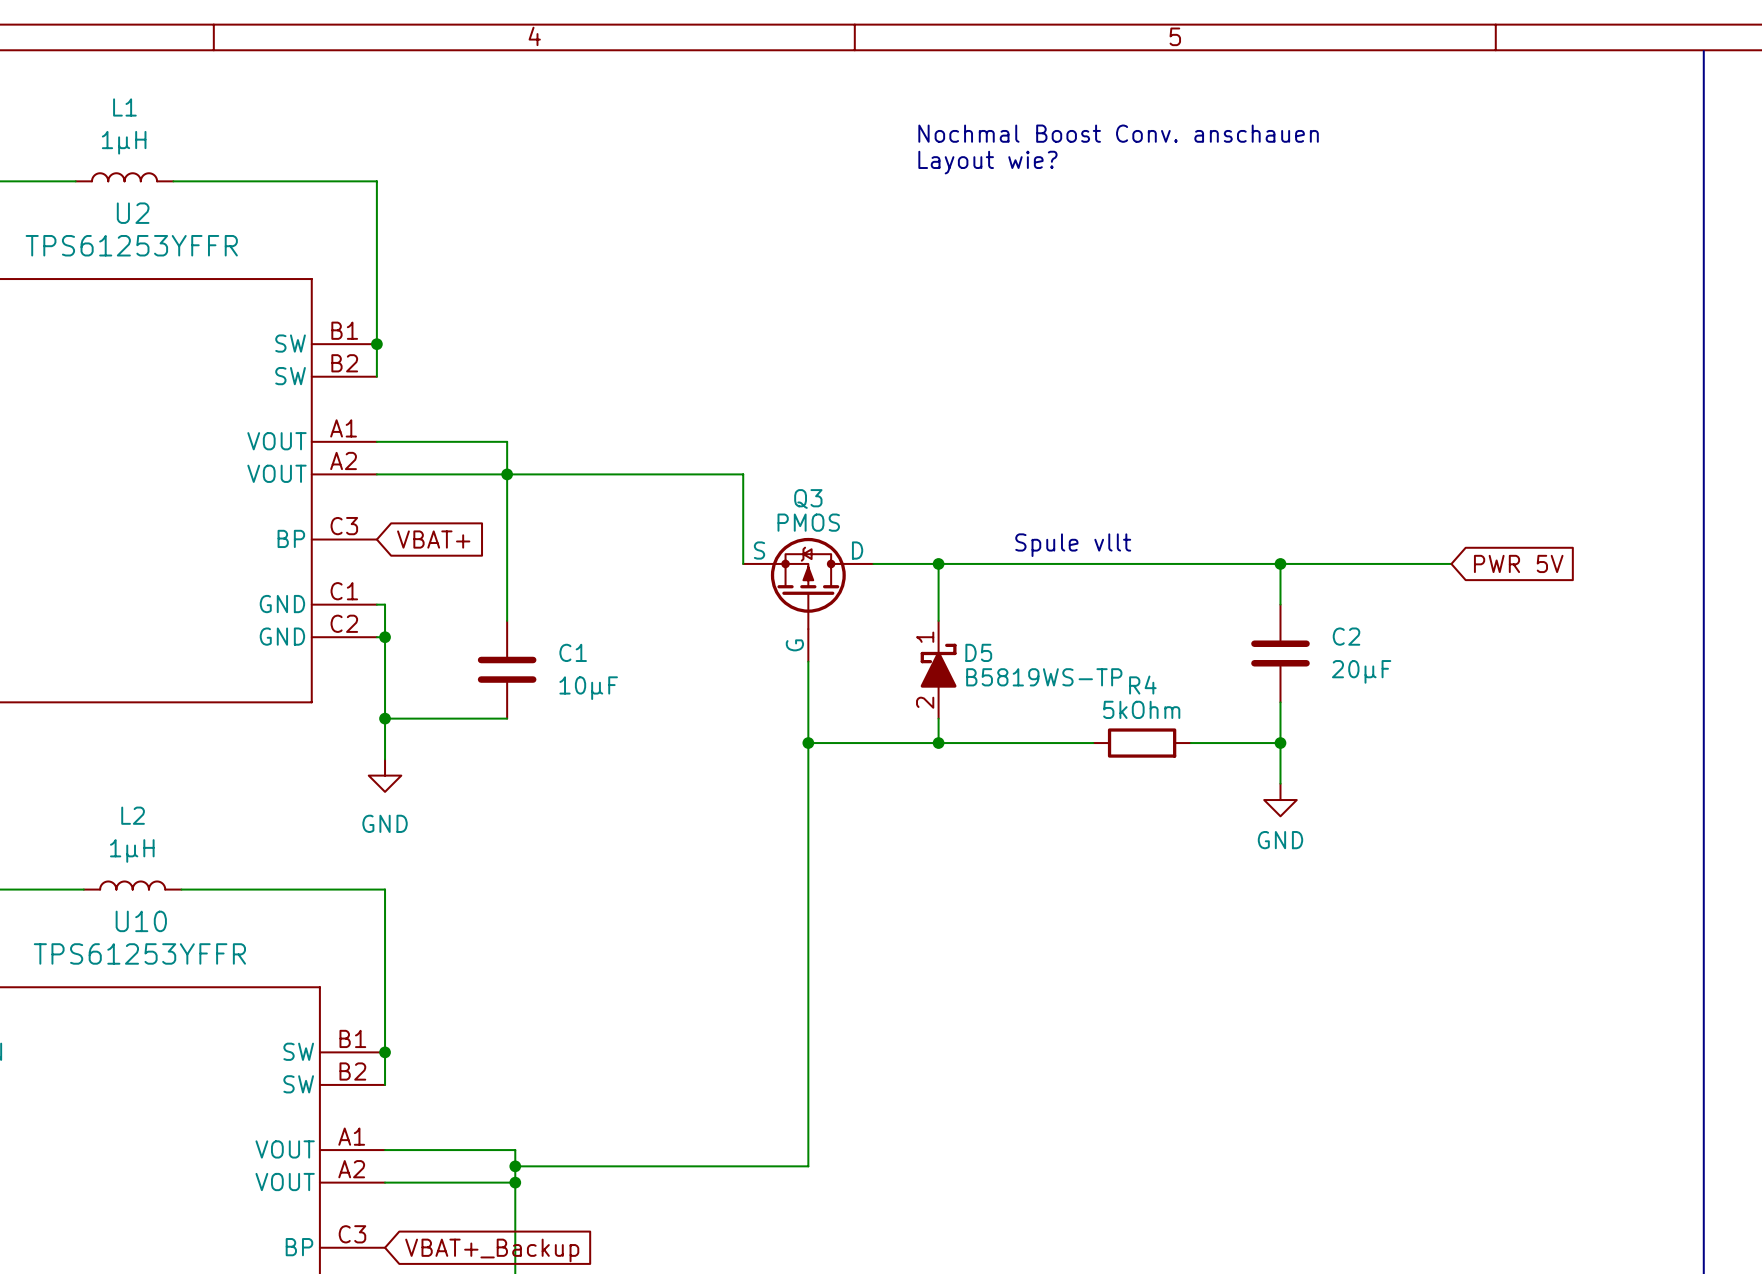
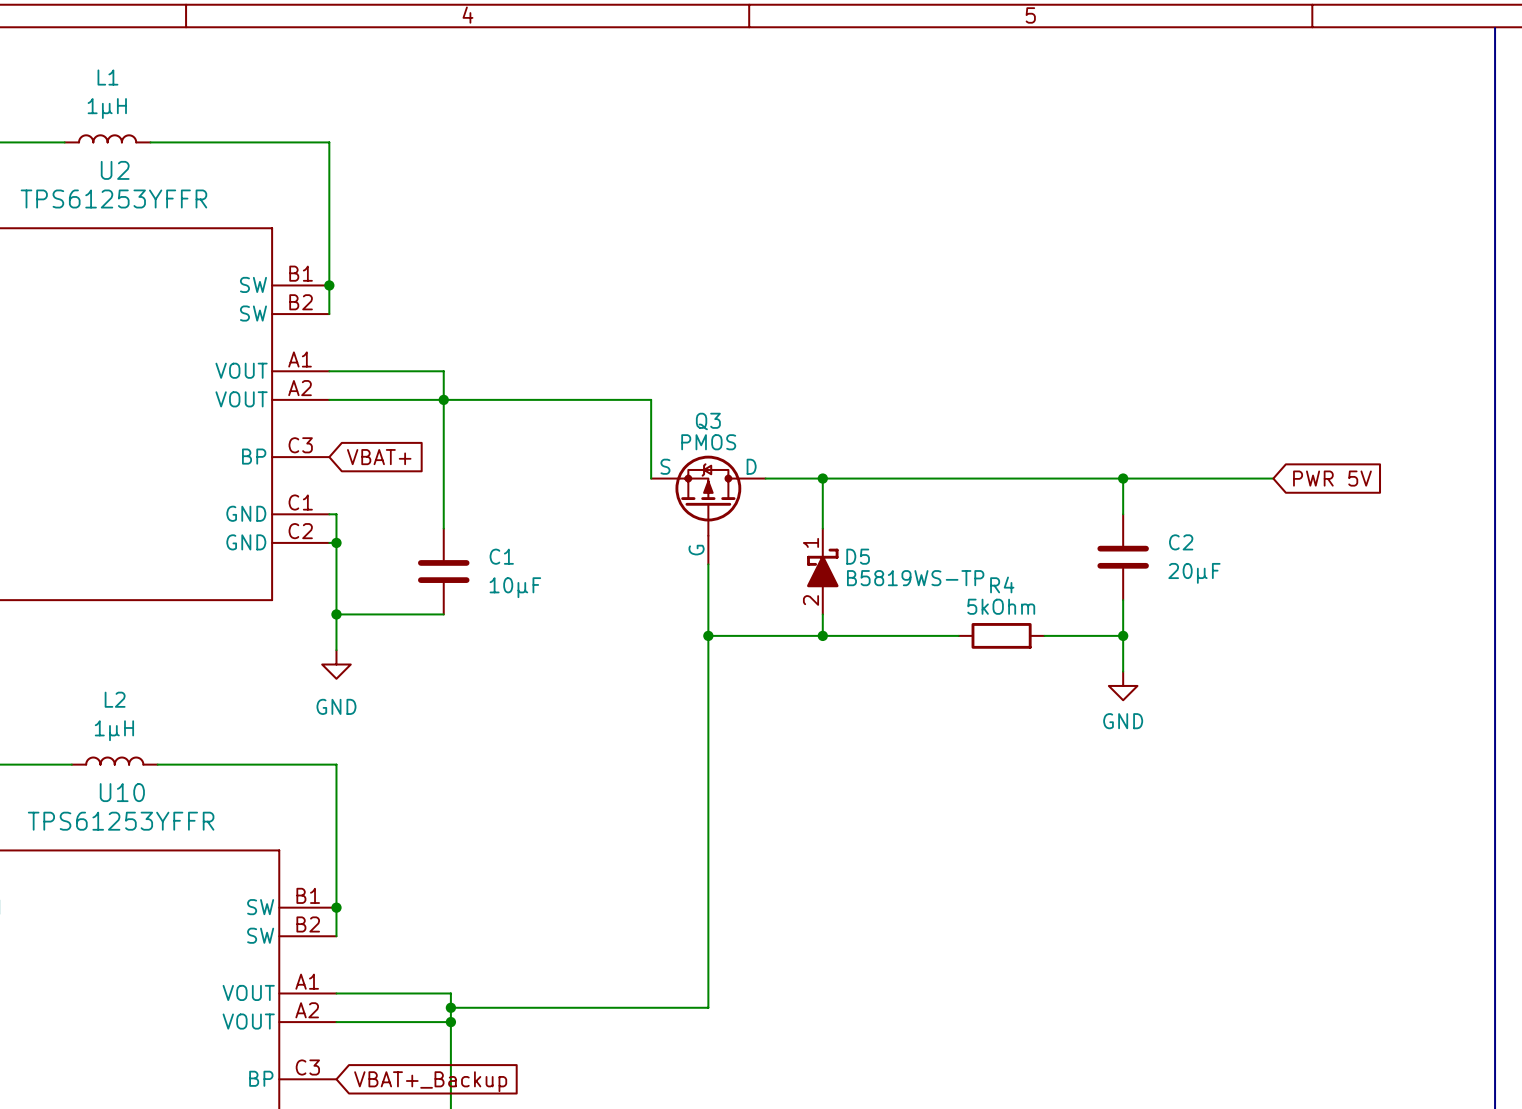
text: Nochmal Boost Conv. anschauen (1118, 133) -> none
text: Layout wie? (987, 162) -> none
text: Spule vllt (1073, 545) -> none

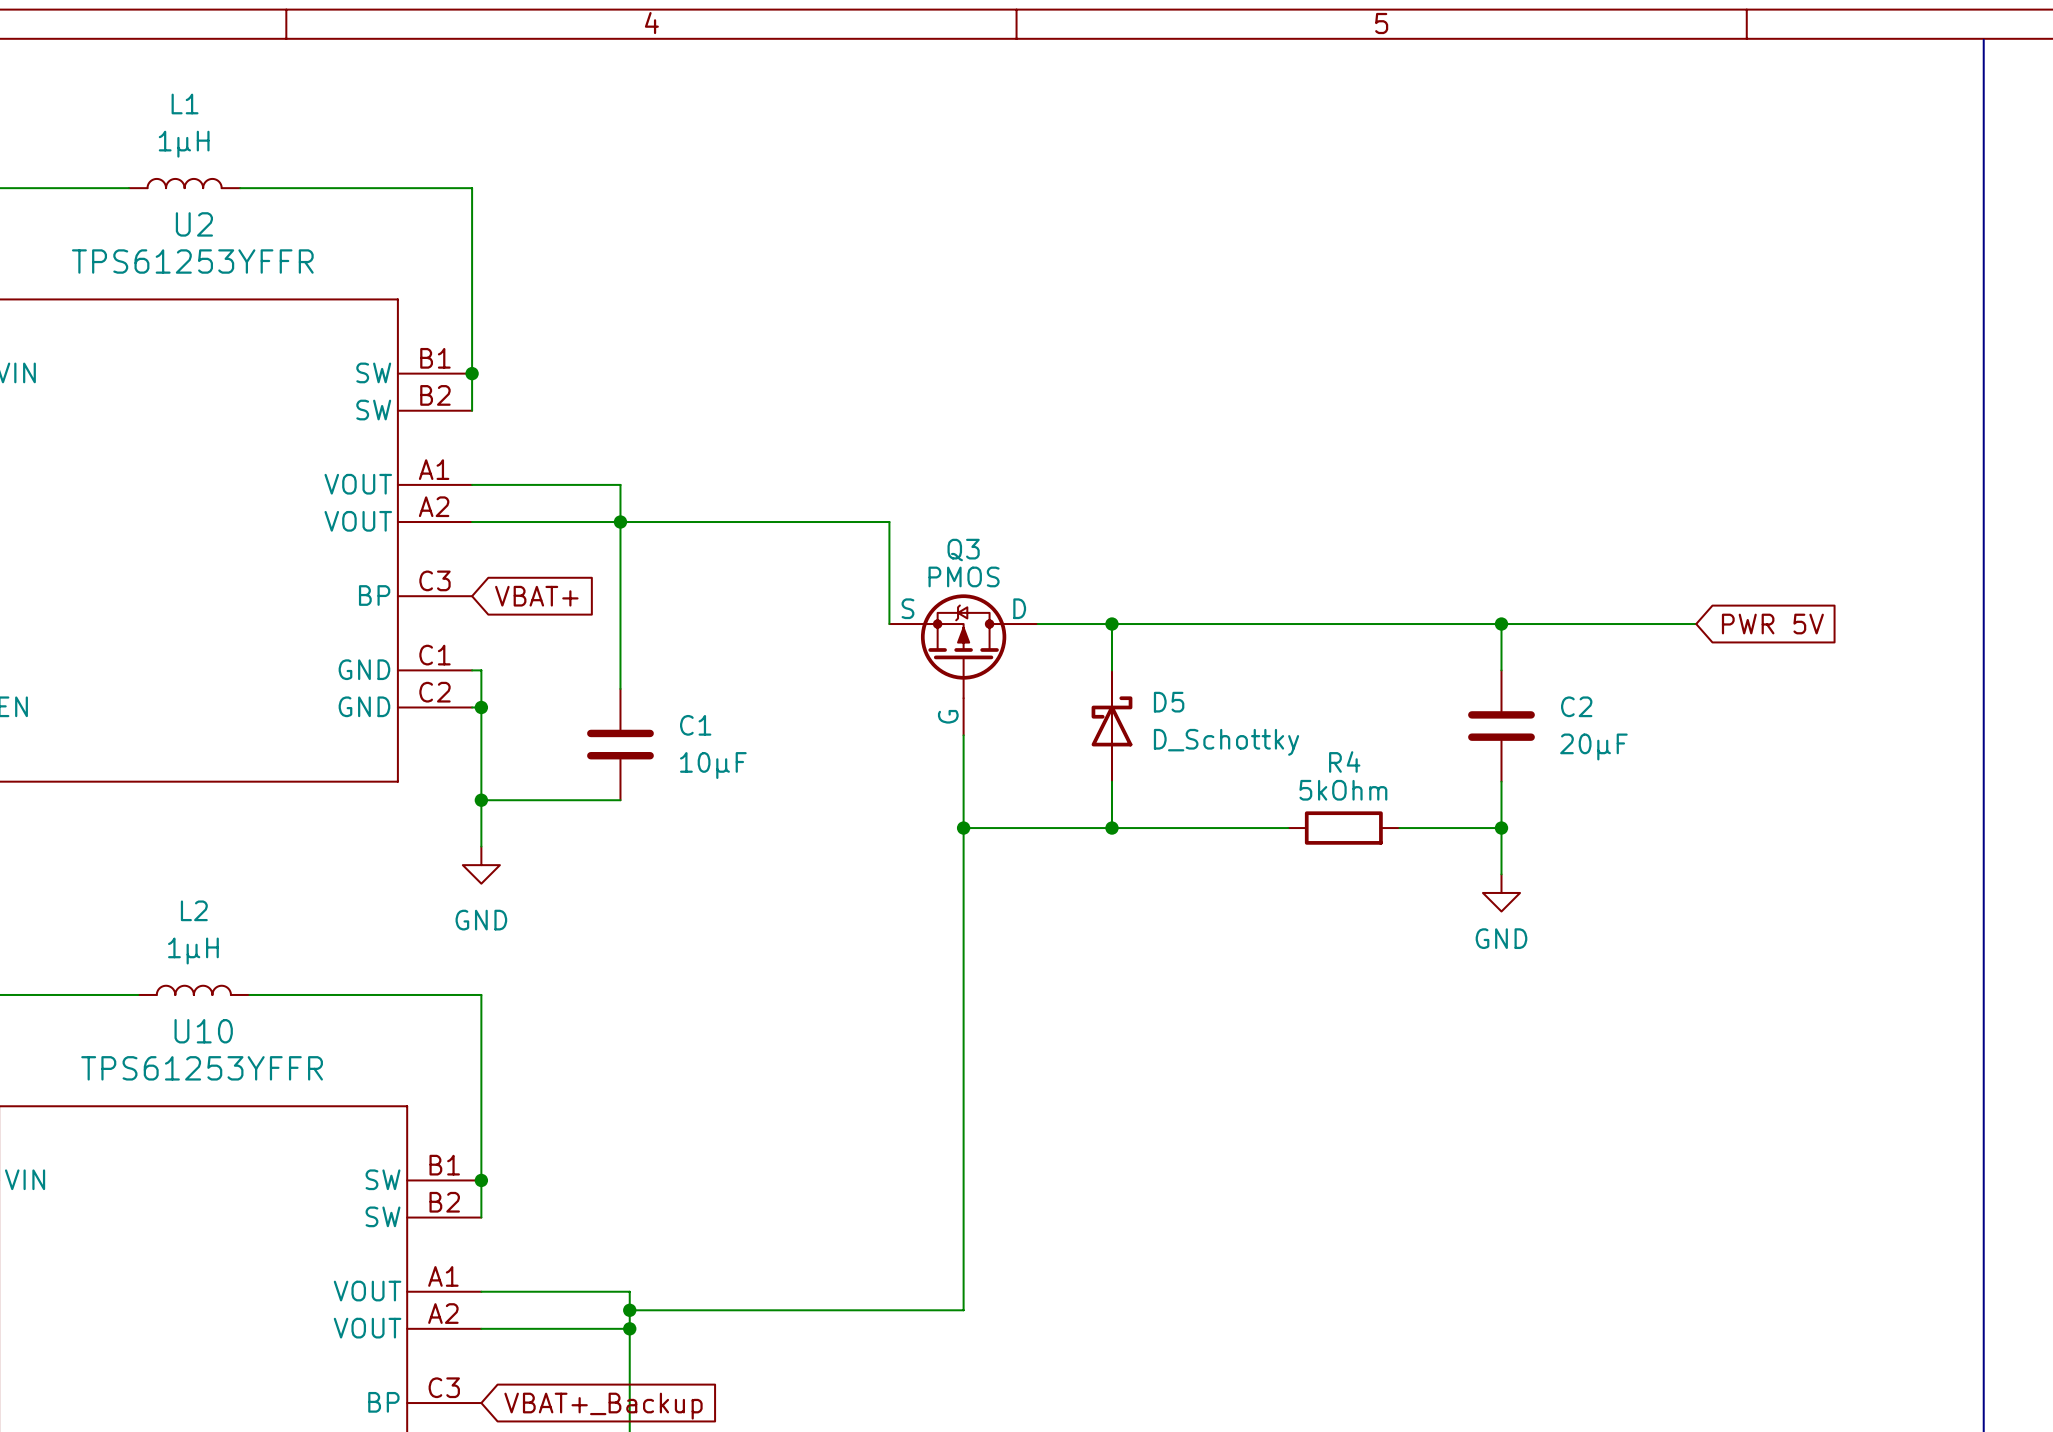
D5 symbol: [807, 528, 839, 615] -> [1091, 670, 1133, 782]
D5 value: B5819WS-TP (915, 578) -> D_Schottky (1226, 742)

